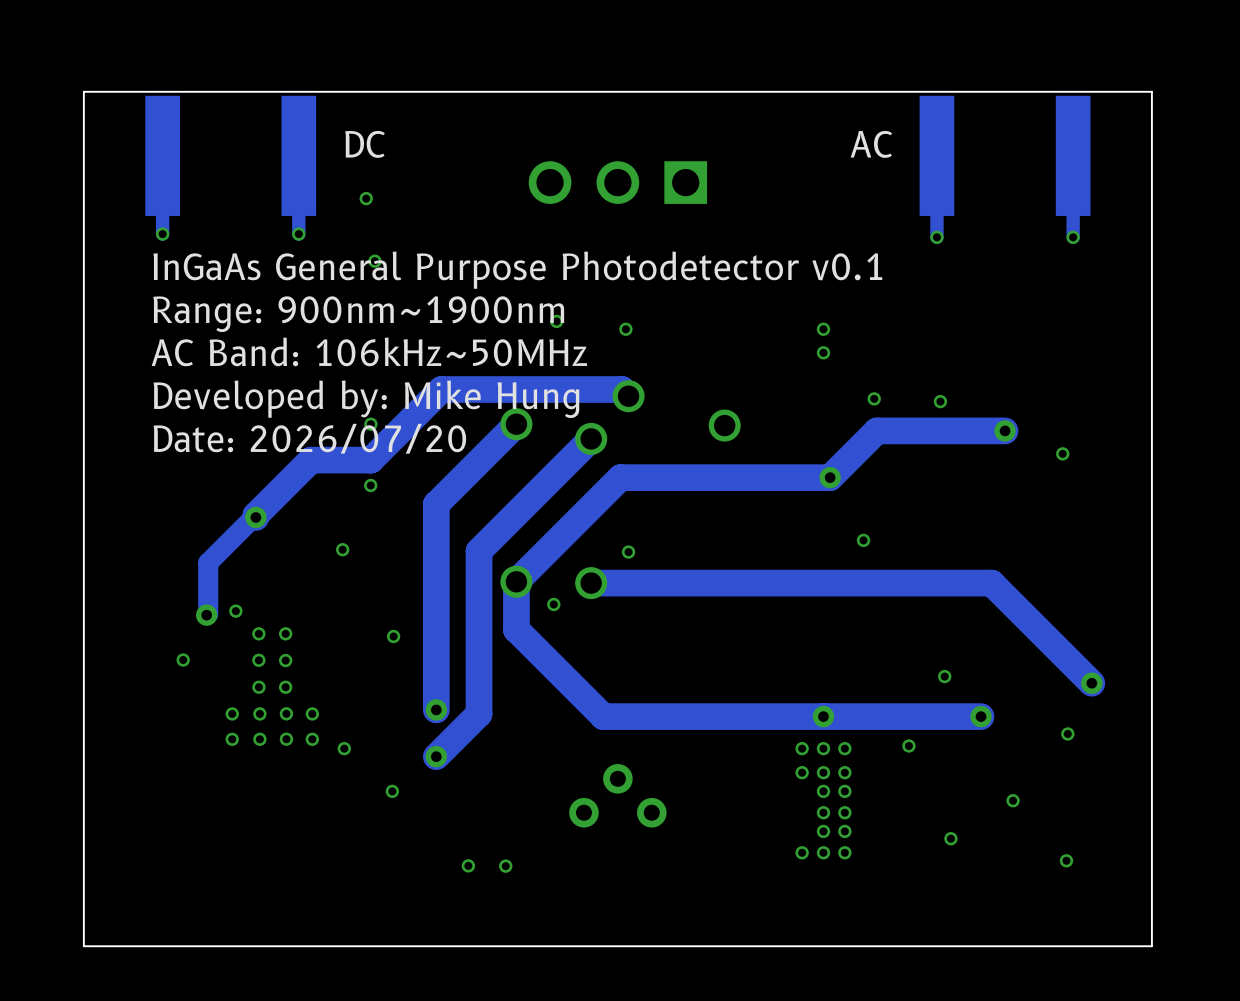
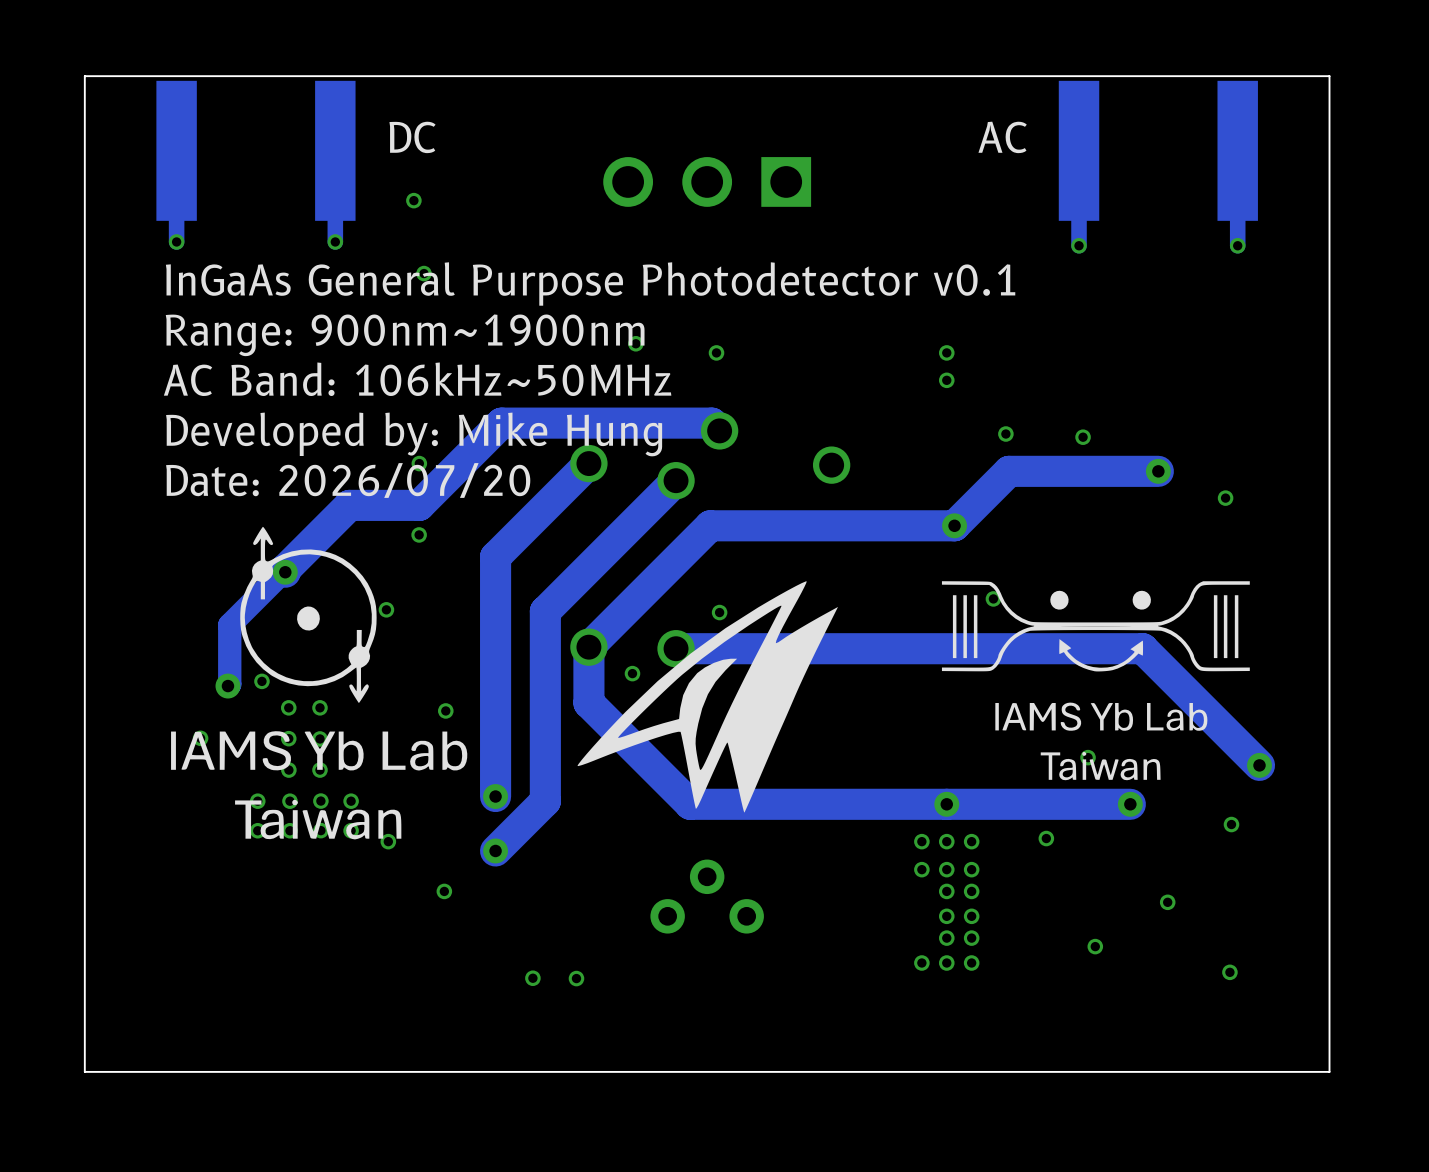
drawing: none -> [171, 526, 468, 840]
drawing: none -> [577, 581, 838, 813]
drawing: none -> [941, 581, 1250, 781]

